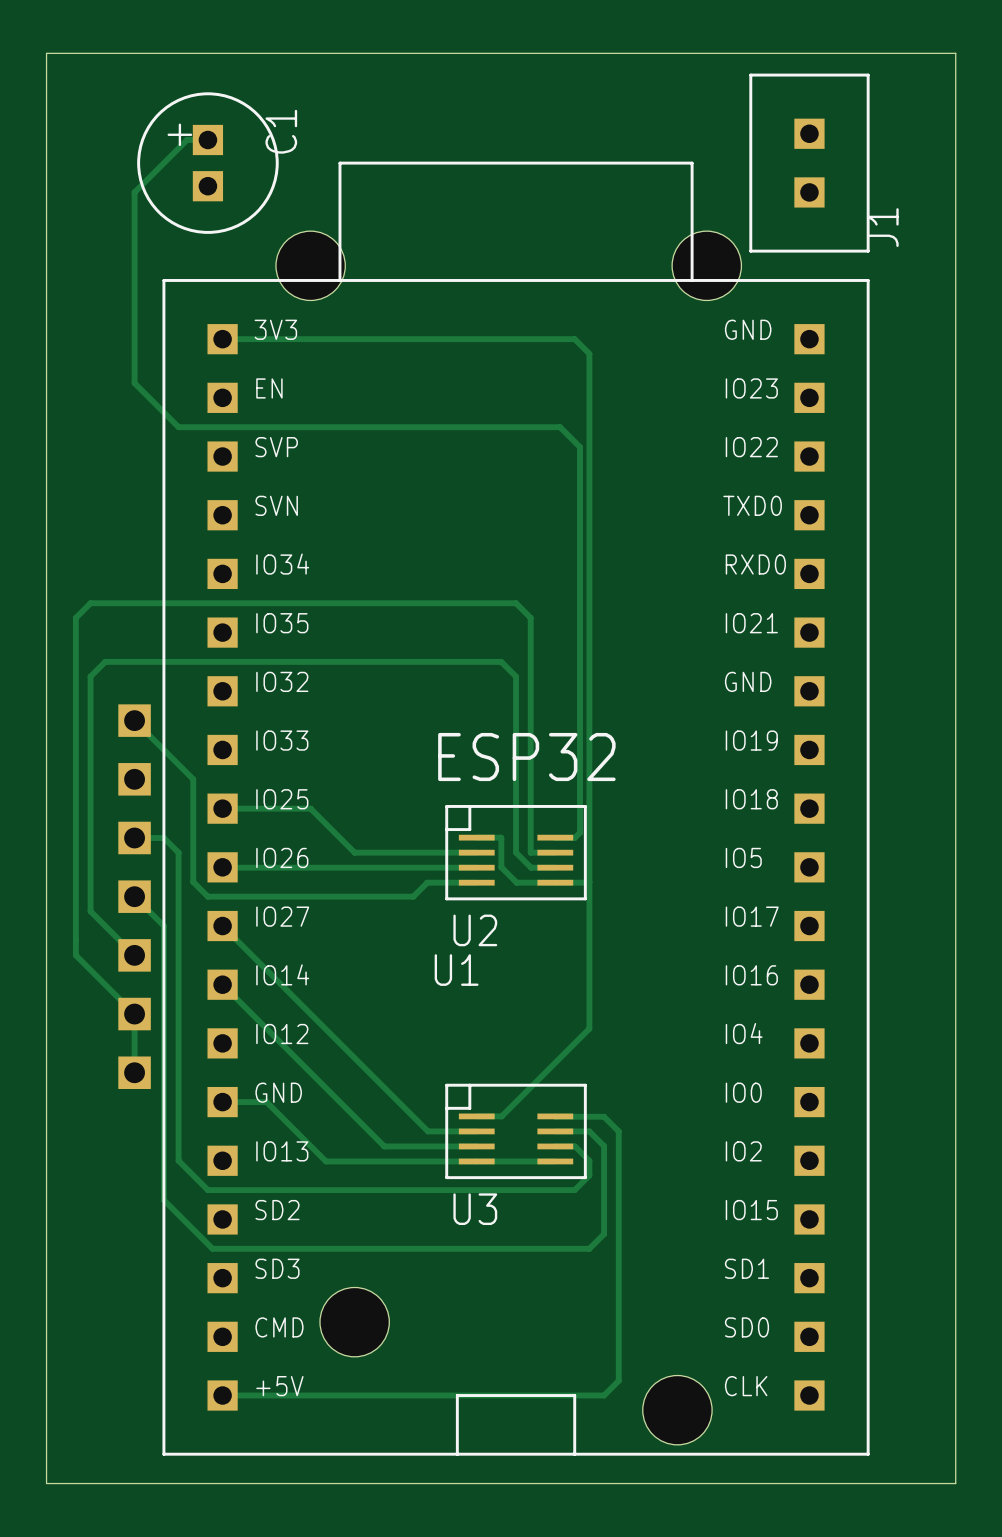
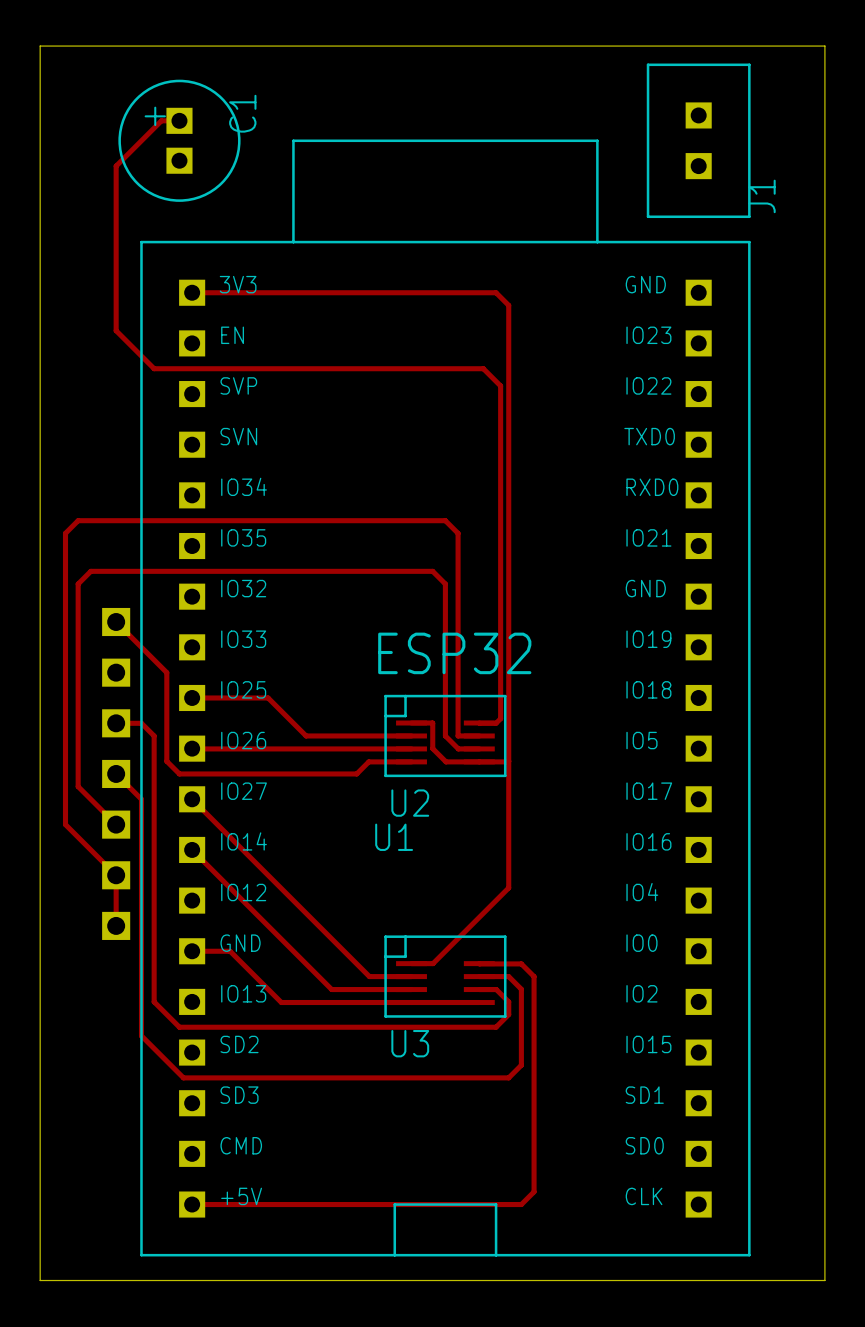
hole: (310, 265) -> none
hole: (706, 265) -> none
hole: (354, 1322) -> none
hole: (677, 1410) -> none

